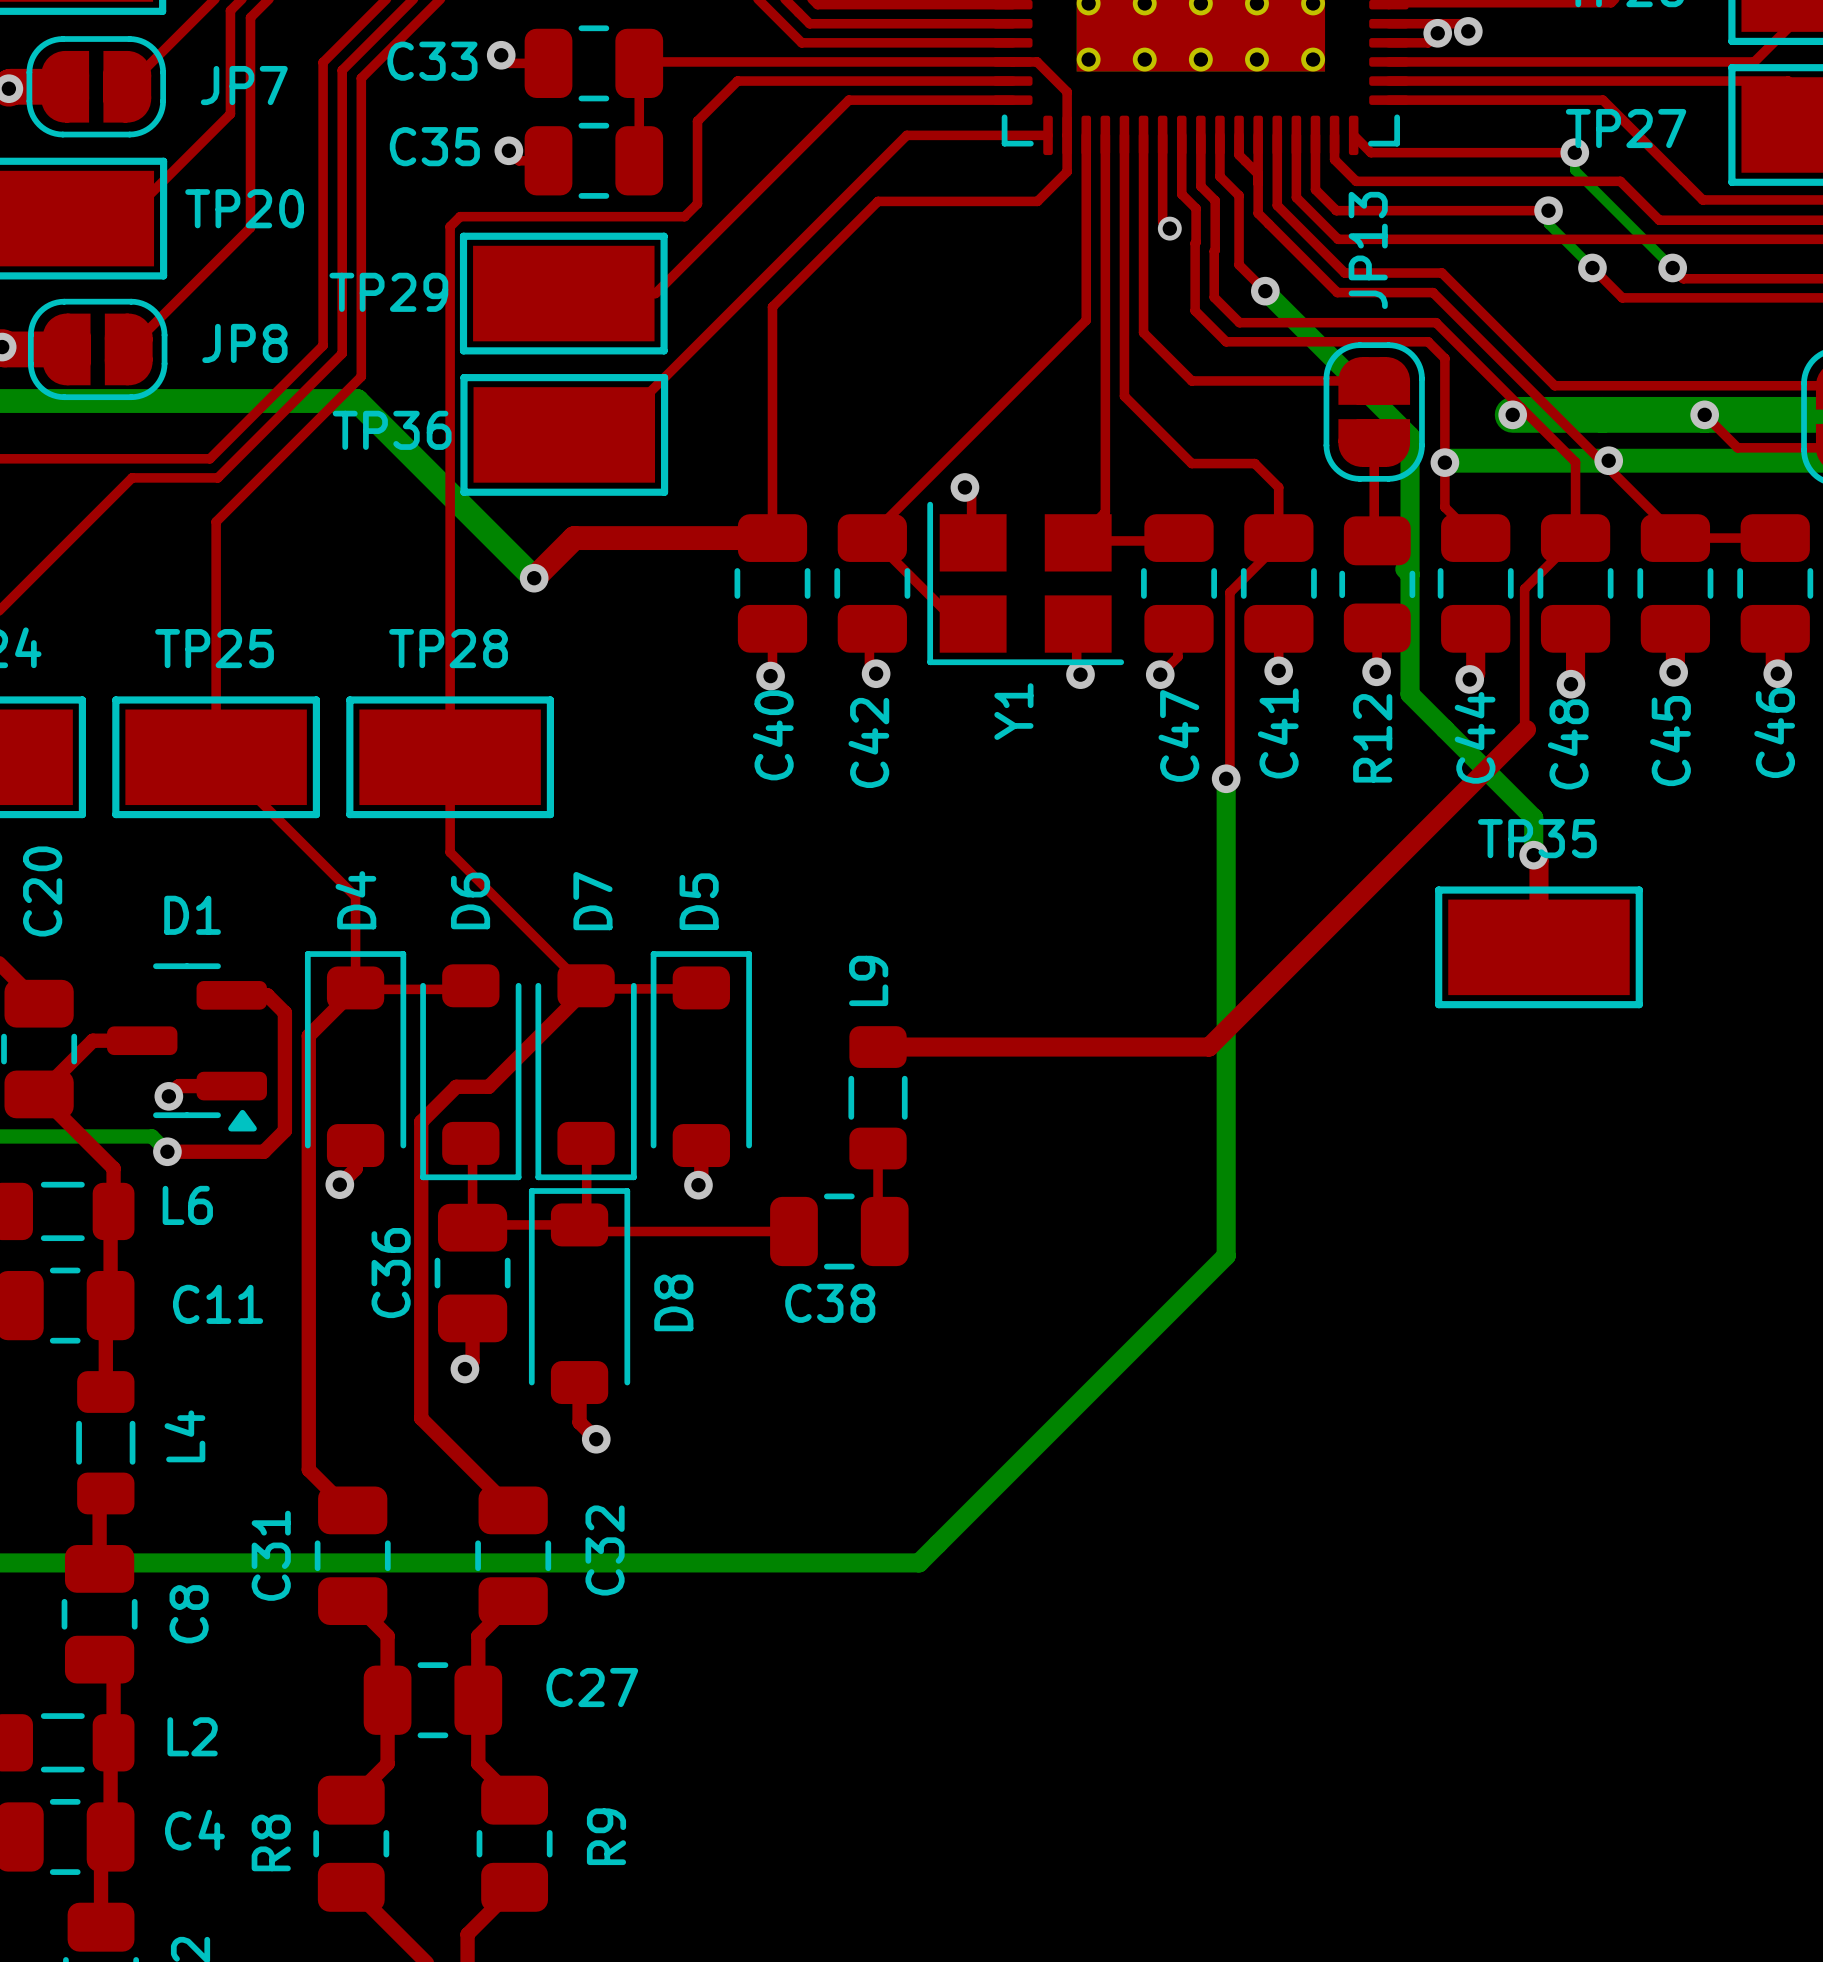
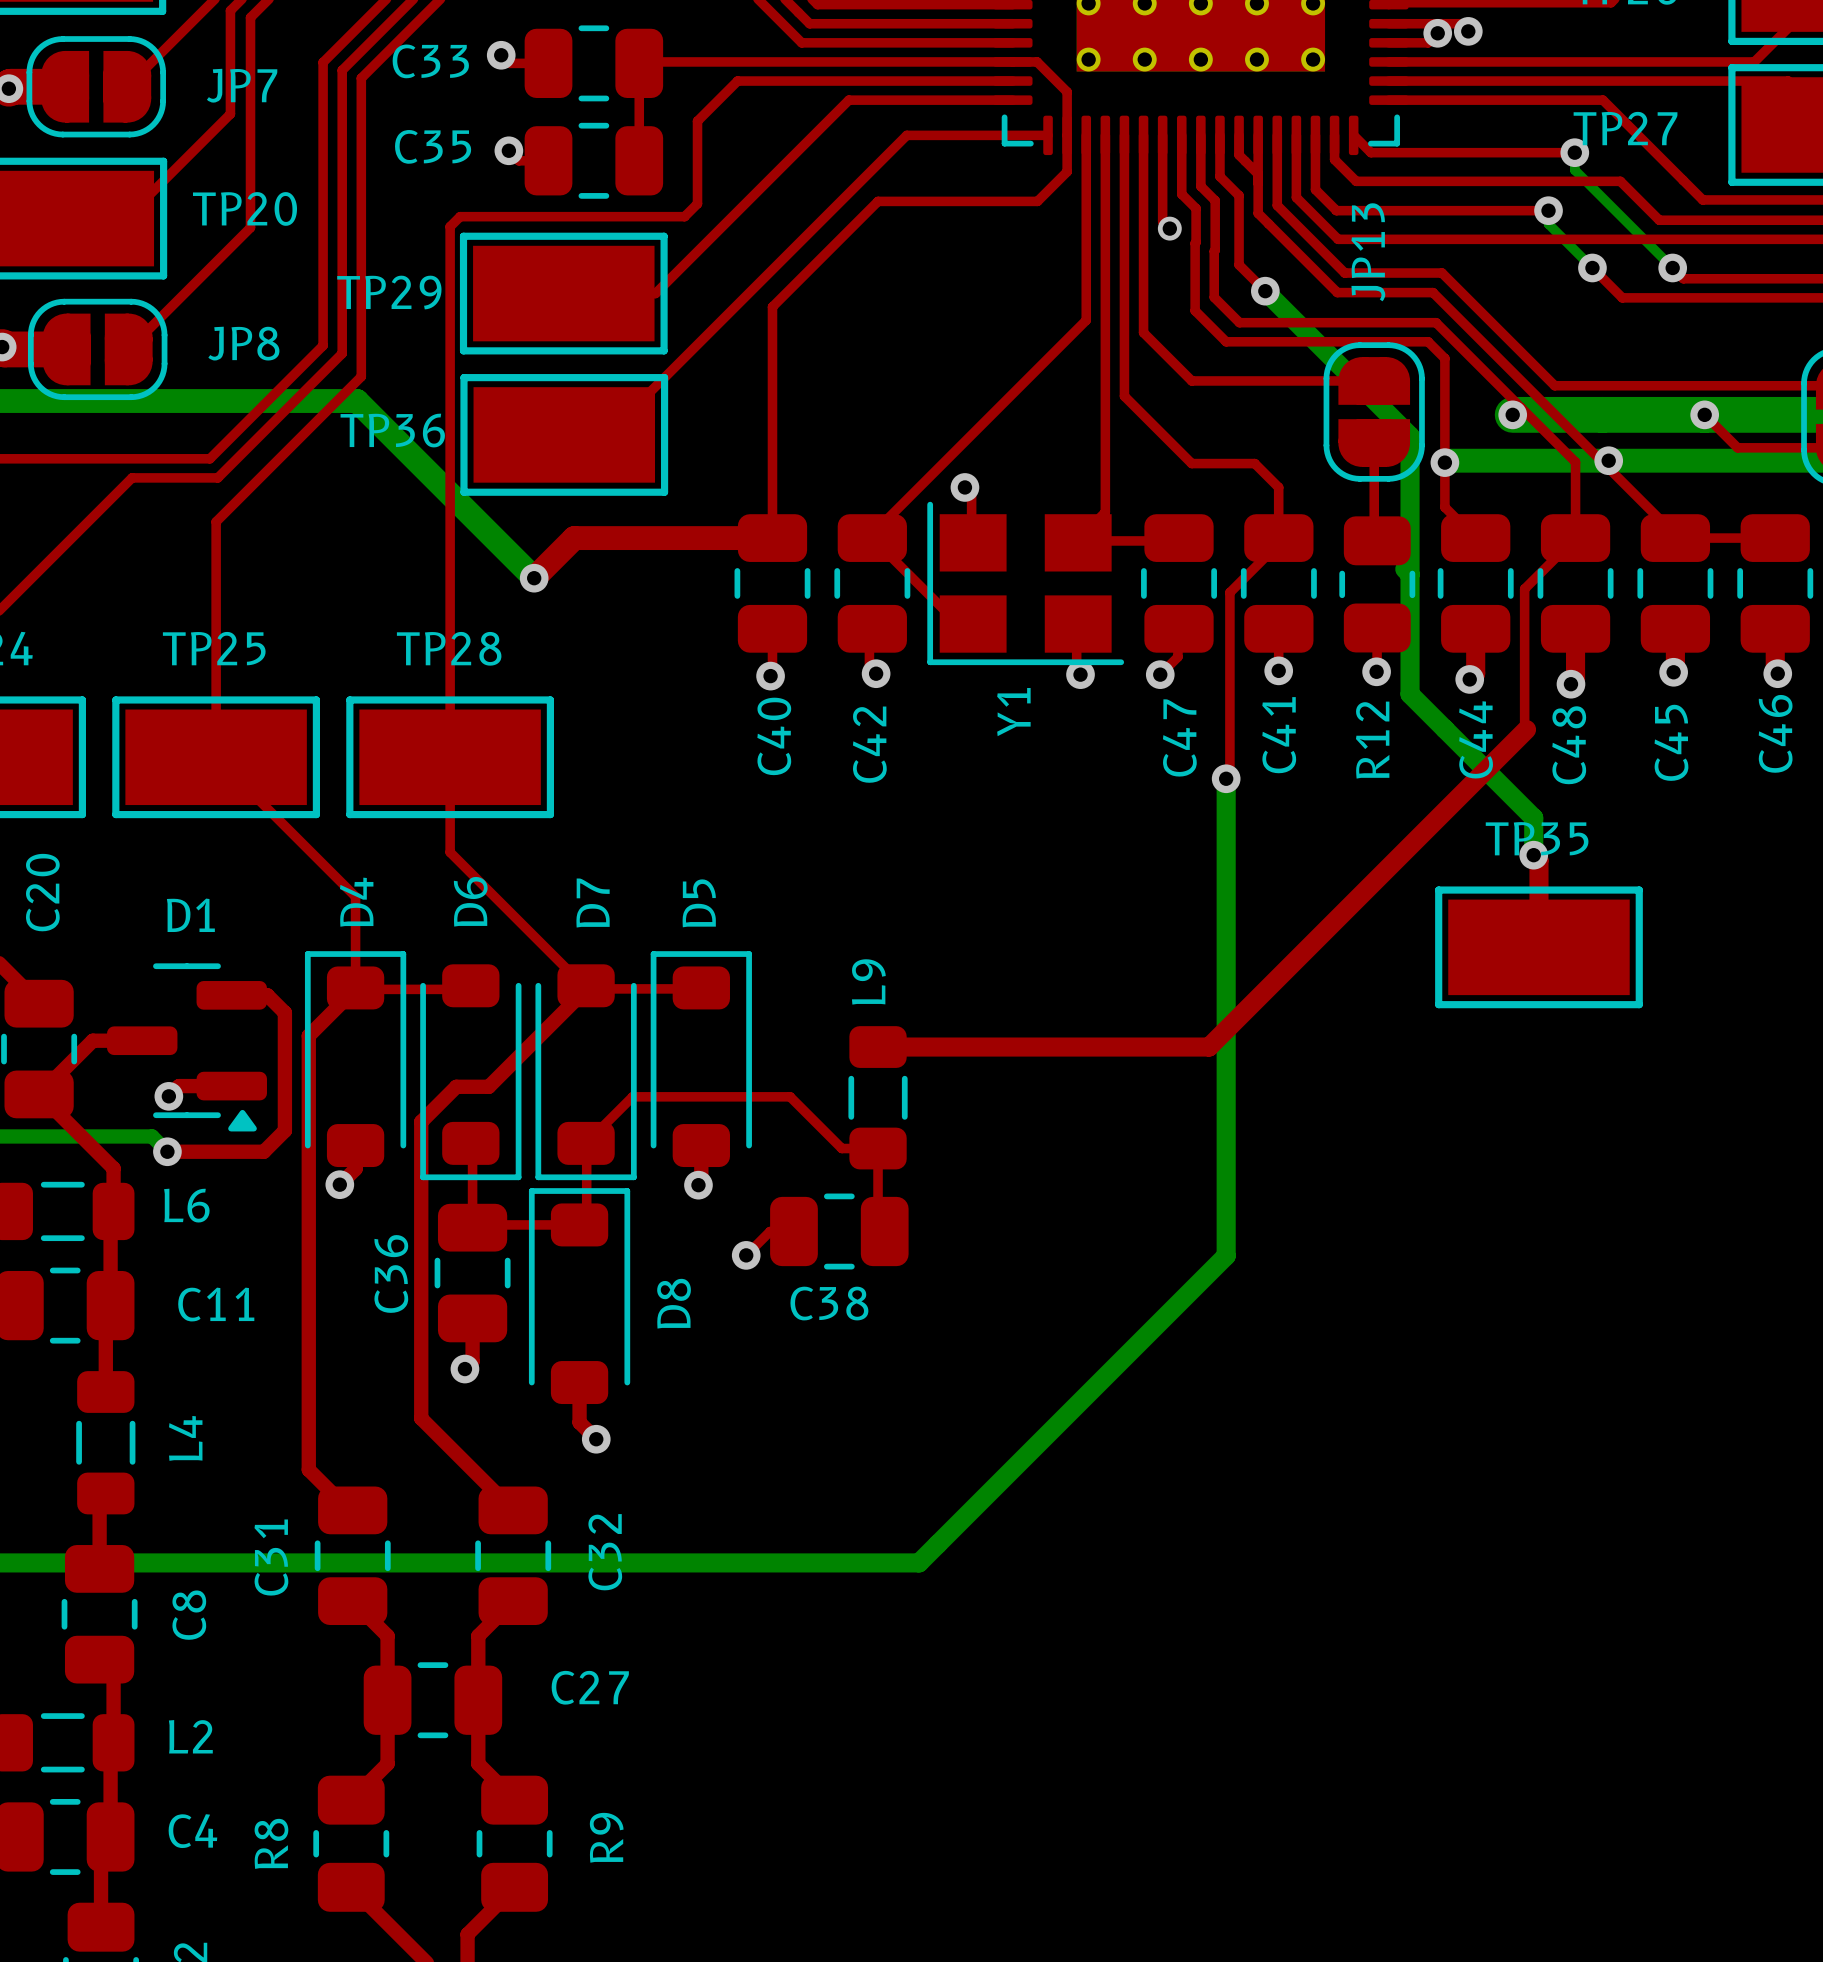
top track: none -> (586, 1143) (632, 1096) (790, 1096) (841, 1148) (878, 1148)
top track: (586, 1231) (770, 1231) -> (746, 1255) (770, 1231)
via: none -> (746, 1255)

